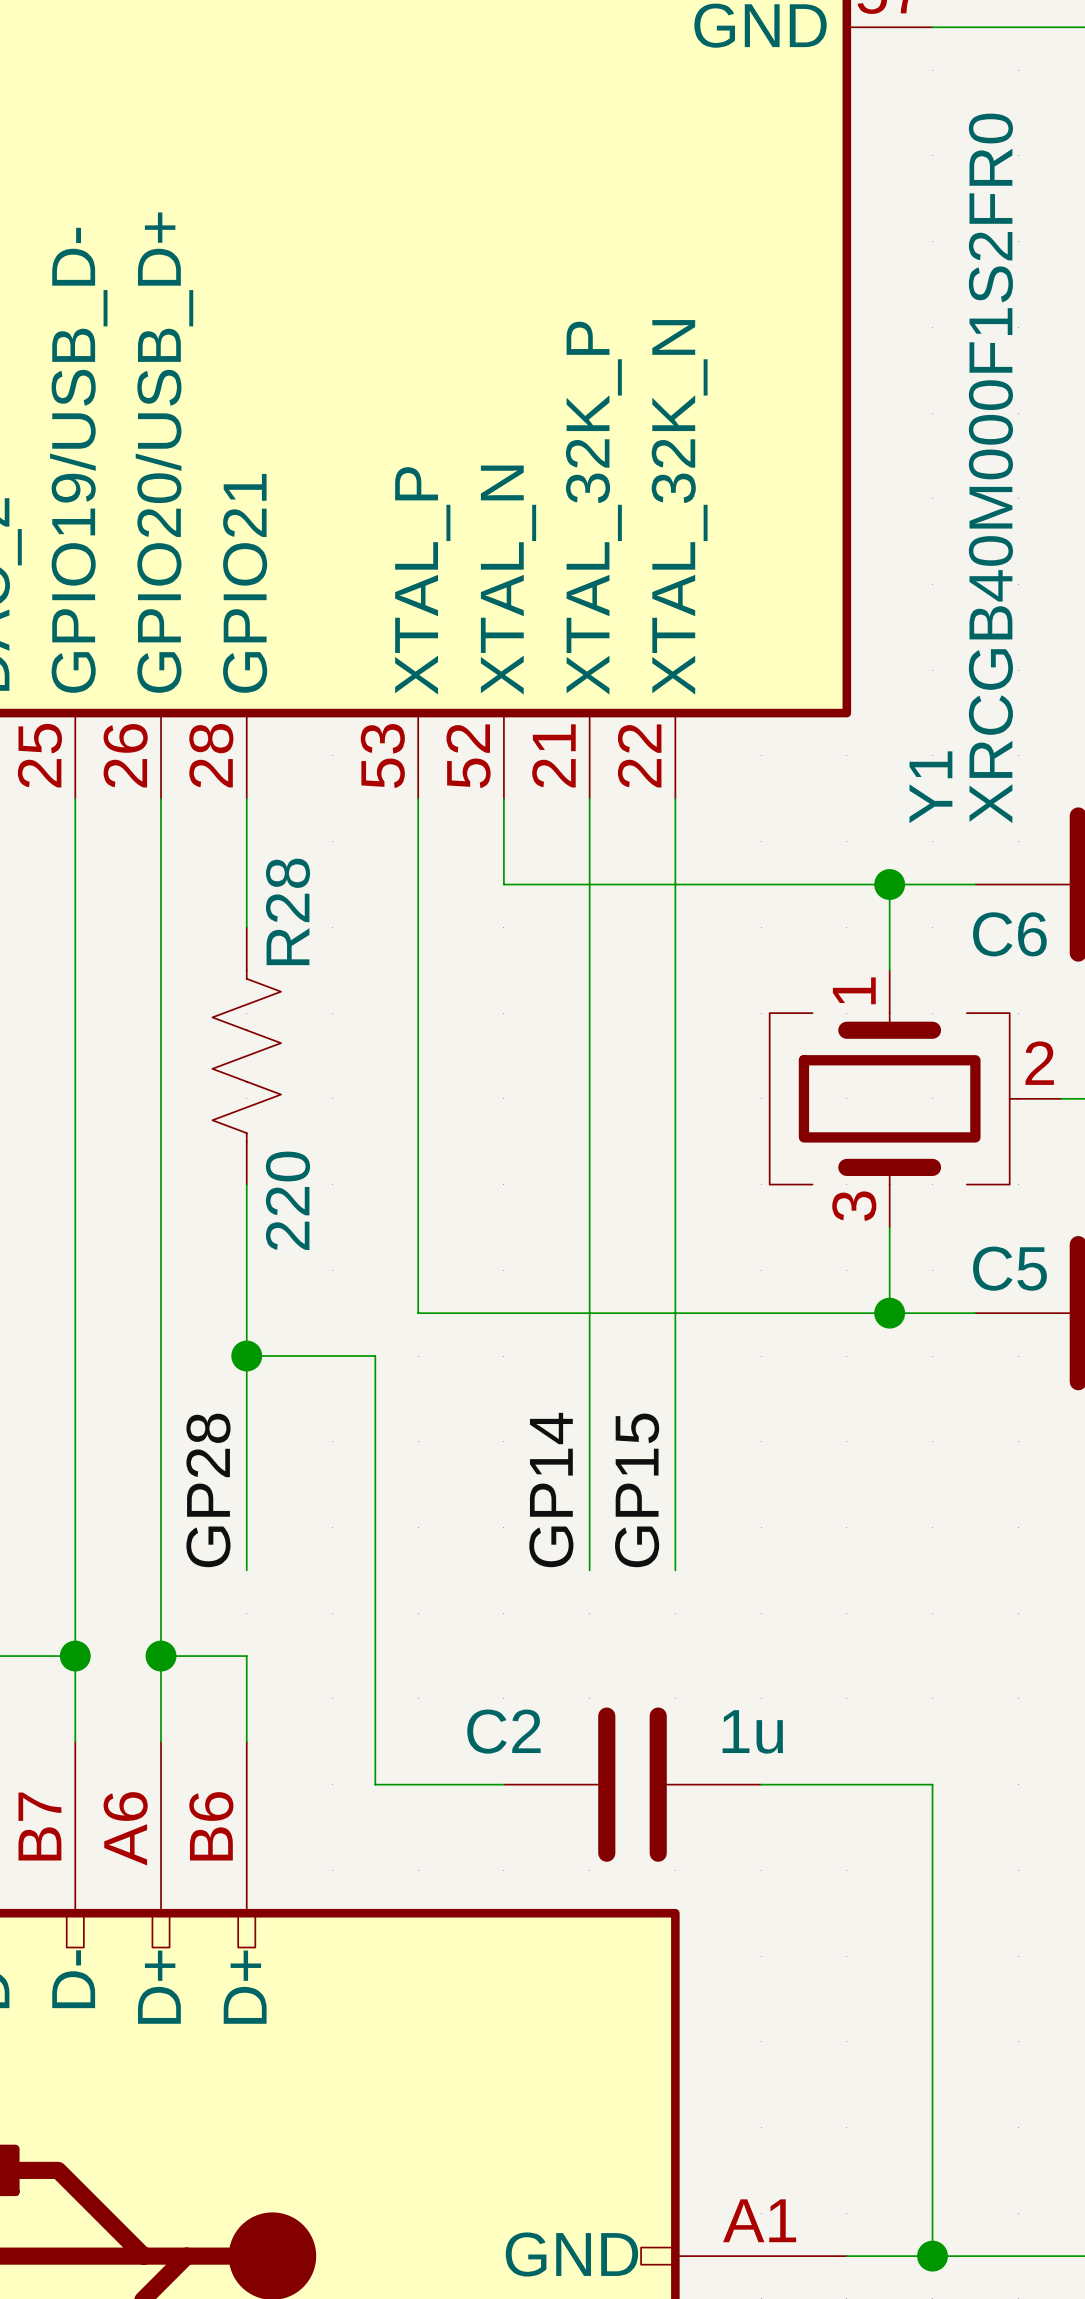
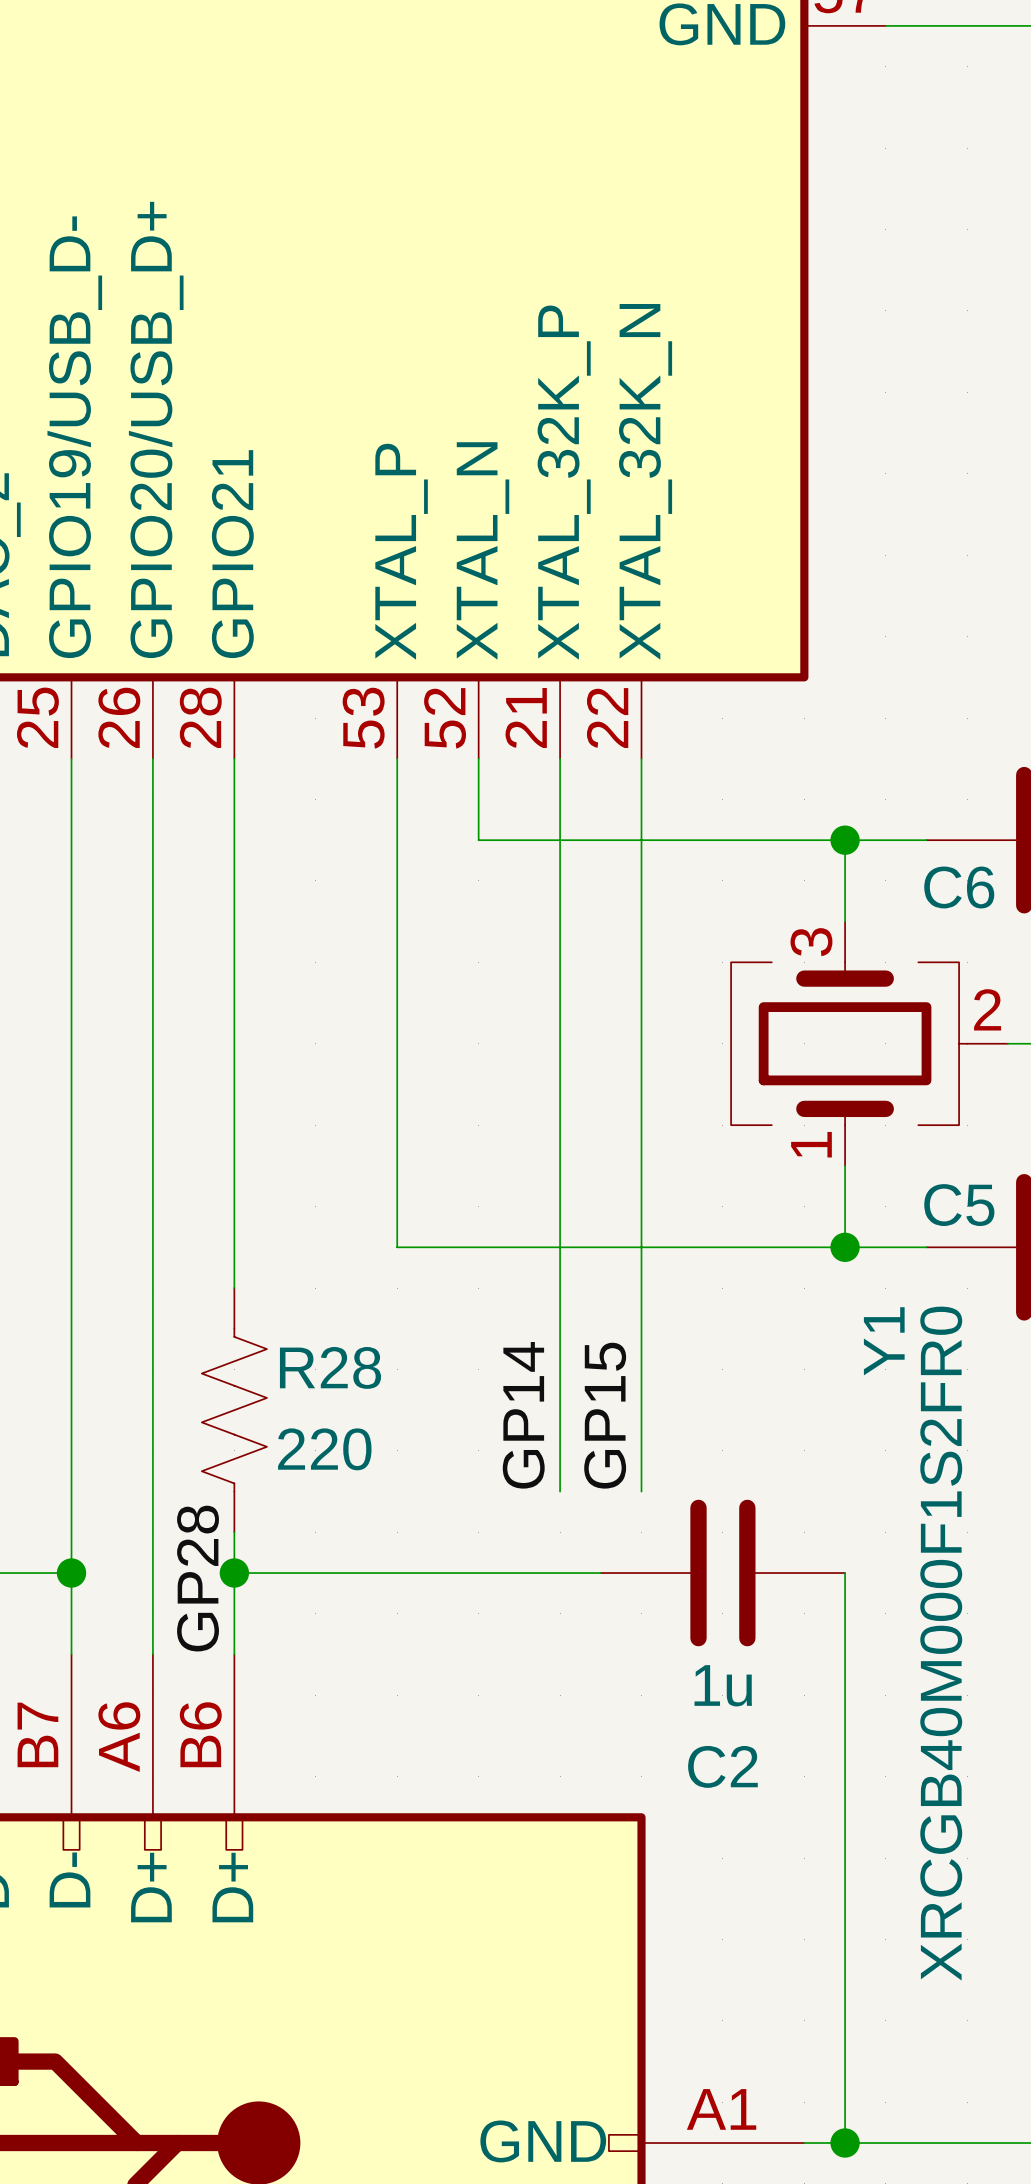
R28 name rotation: 0° (287, 911) -> 90° clockwise (330, 1367)
wire: none -> (234, 880) (234, 1125)
R28 position: (246, 1055) -> (234, 1410)
Y1 flip: as is (893, 1098) -> up-down (849, 1043)
R28 value rotation: 0° (287, 1200) -> 90° clockwise (324, 1449)
junction: (246, 1356) -> none
label position: GP28 (208, 1490) -> GP28 (198, 1578)
wire: (246, 1570) (246, 1356) (375, 1356) (375, 1784) (503, 1784) -> none
wire: none -> (234, 1532) (234, 1573) (600, 1573)
wire: (161, 1656) (246, 1656) -> none
junction position: (161, 1656) -> (234, 1573)
wire: none -> (845, 1573) (845, 2143)
C2 name position: C2 (503, 1731) -> C2 (722, 1766)
C2 value position: 1u (752, 1731) -> 1u (723, 1685)
C2 position: (632, 1784) -> (722, 1573)
wire: (761, 1784) (932, 1784) (932, 2256) -> none
junction position: (932, 2256) -> (845, 2143)

